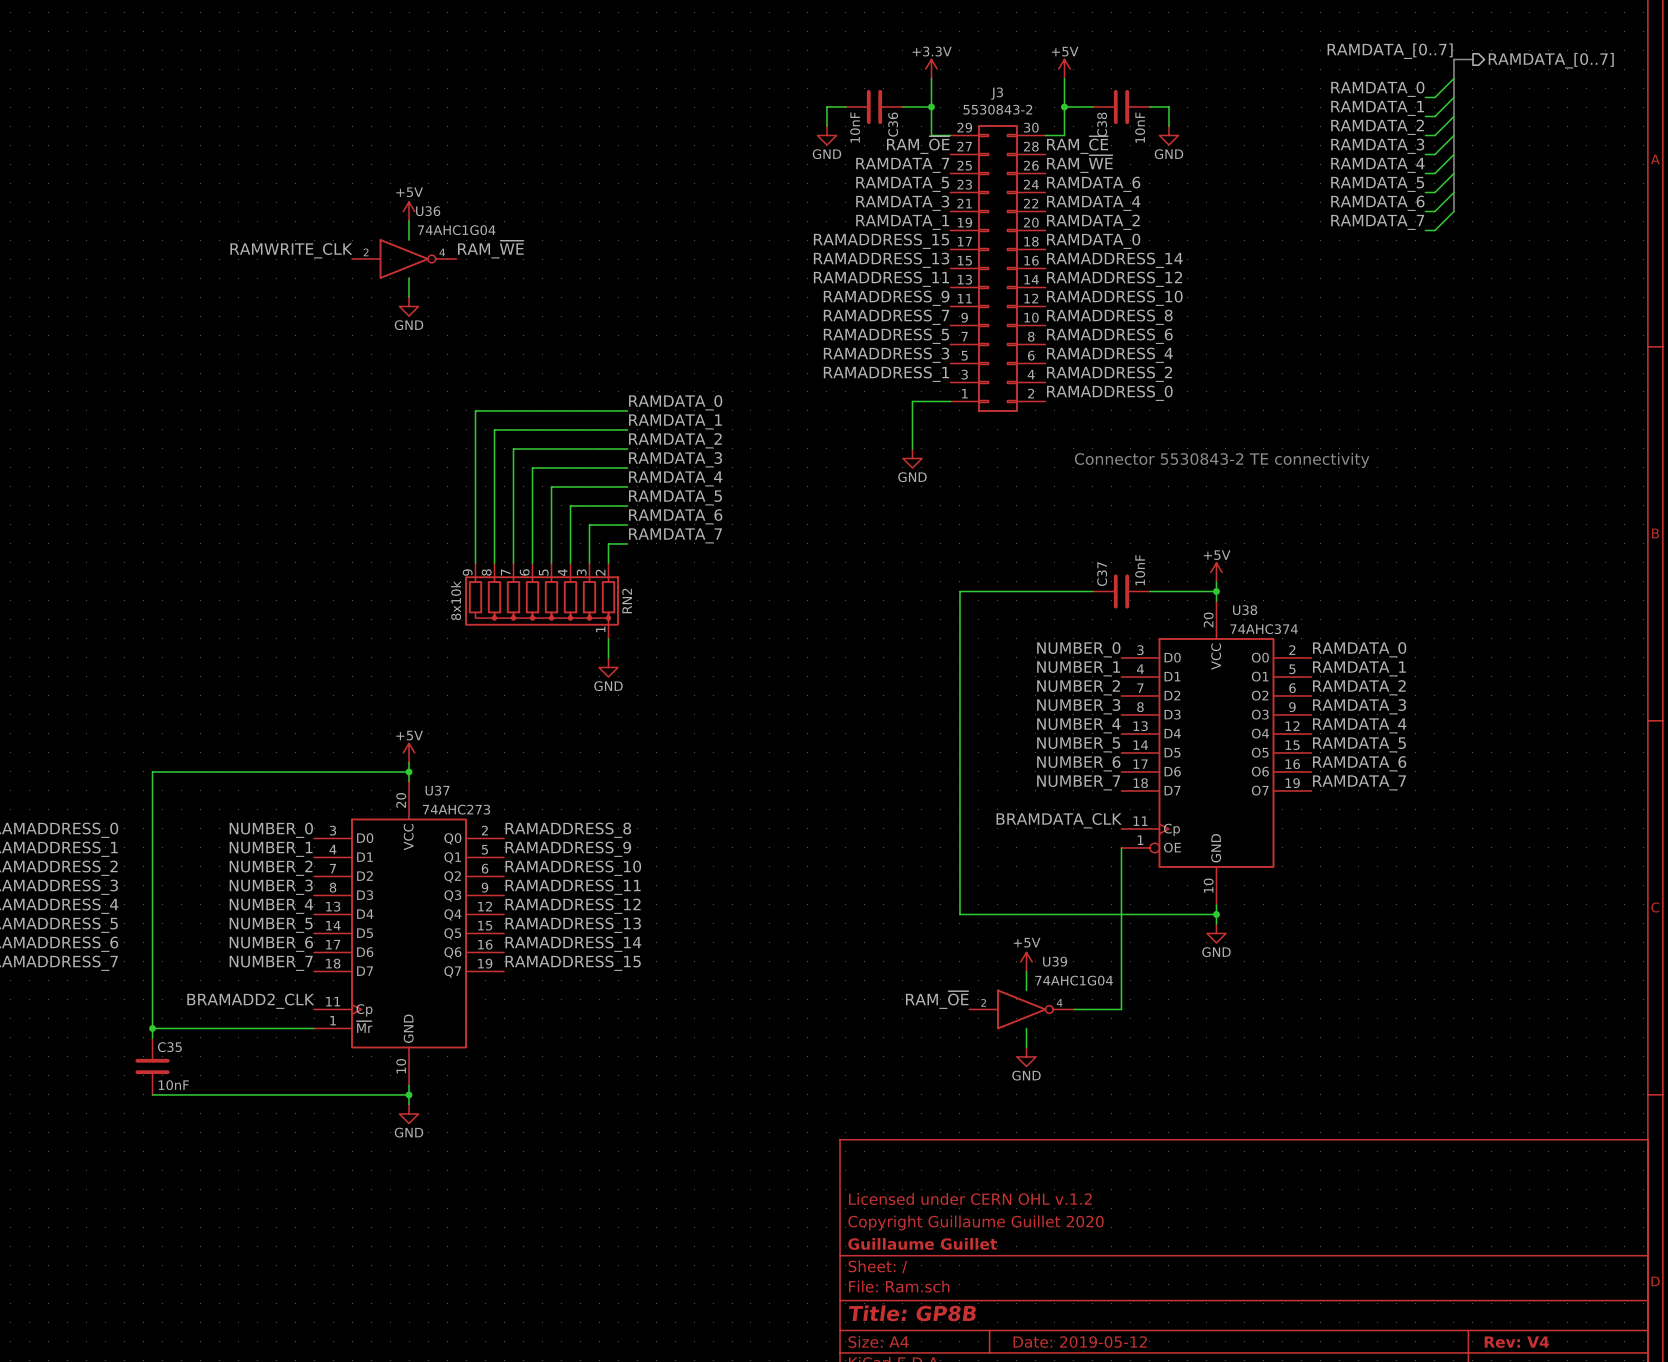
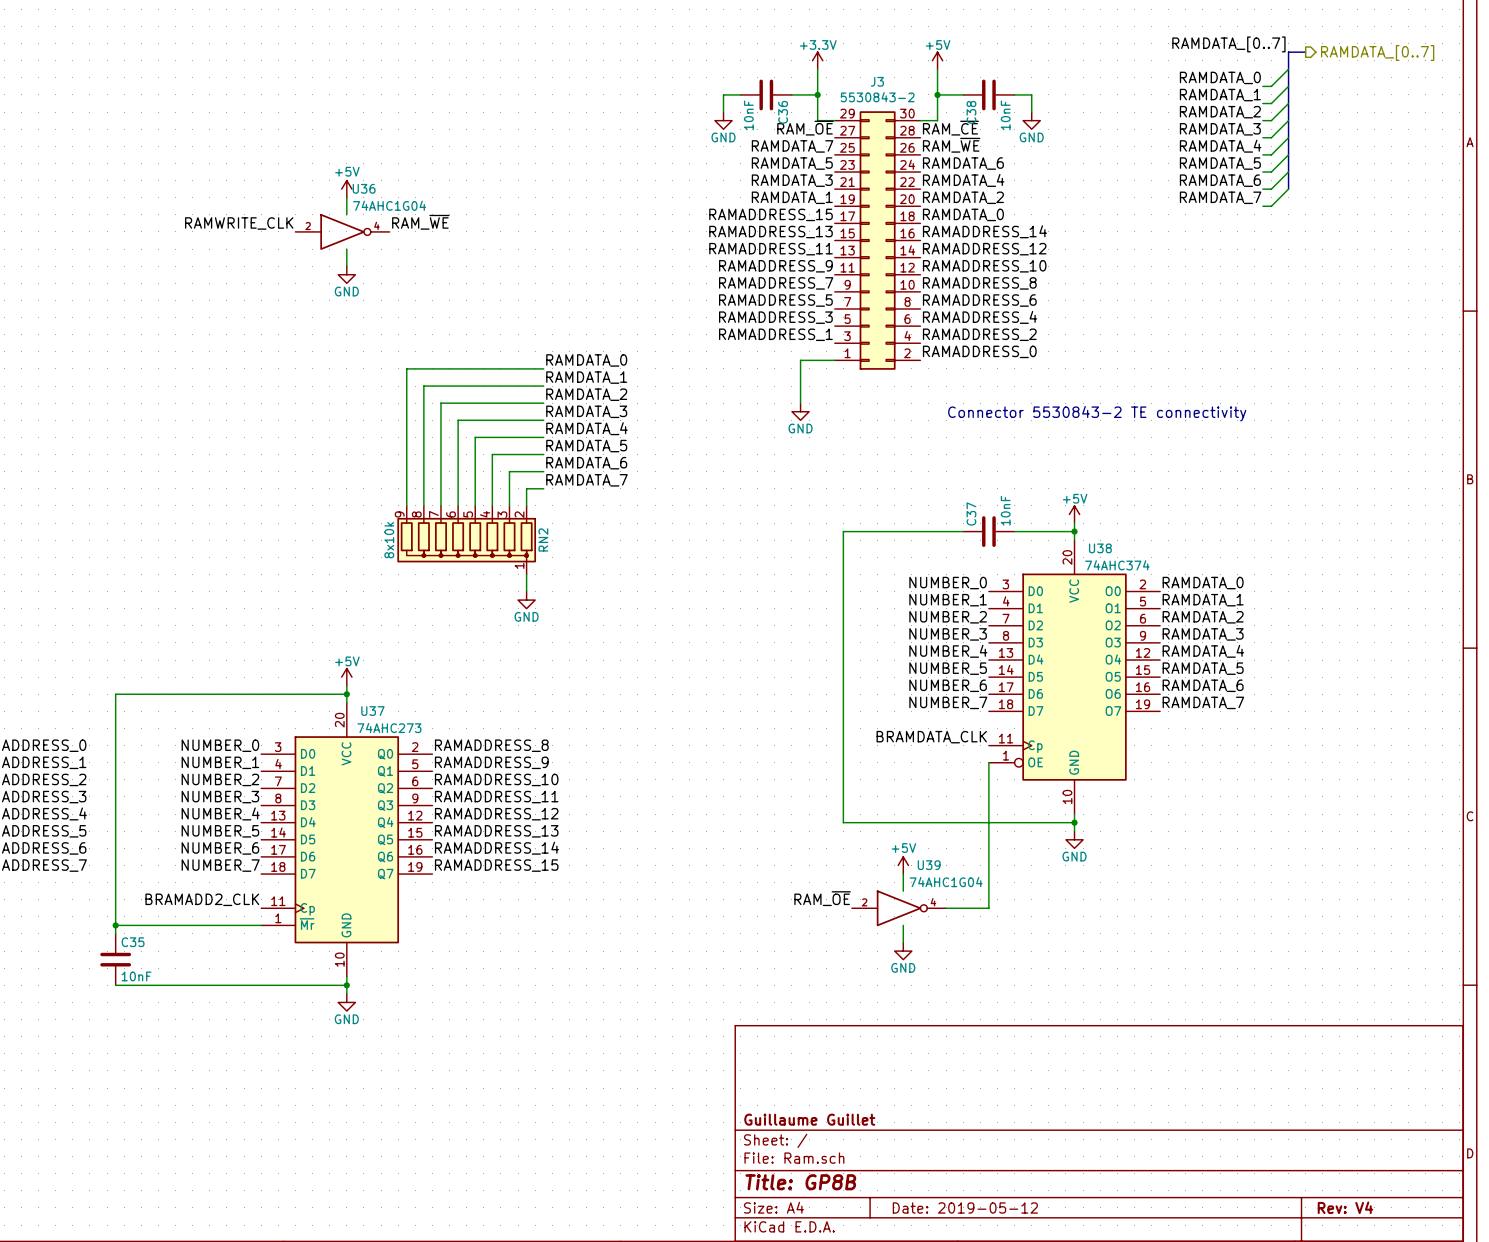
title block: Licensed under CERN OHL v.1.2 (970, 1199) -> none
title block: Copyright Guillaume Guillet 2020 (976, 1222) -> none

